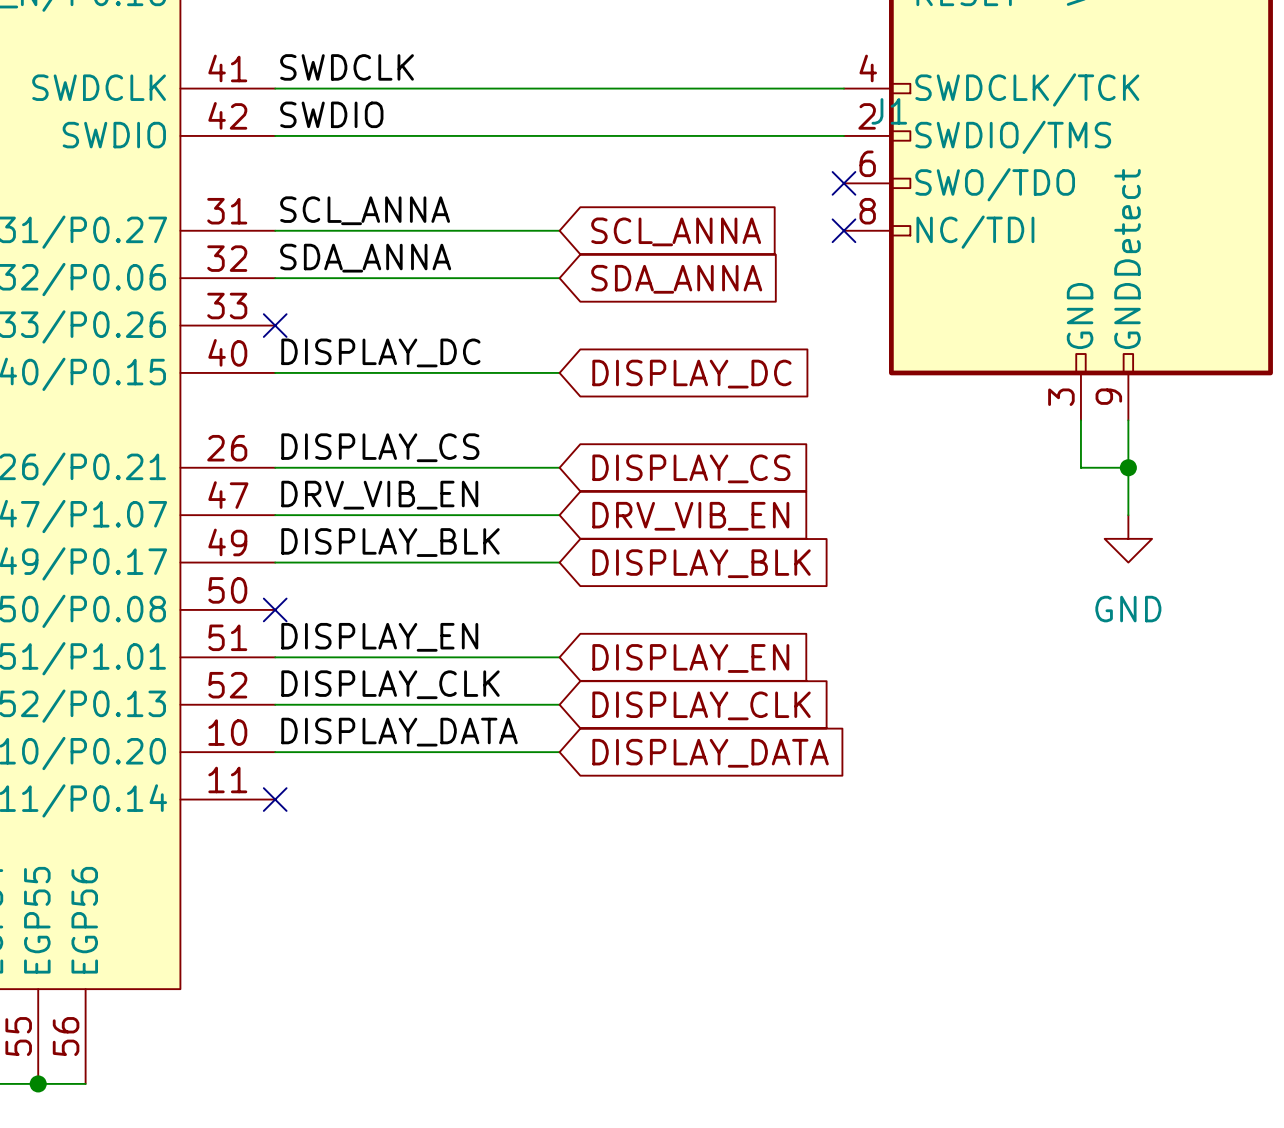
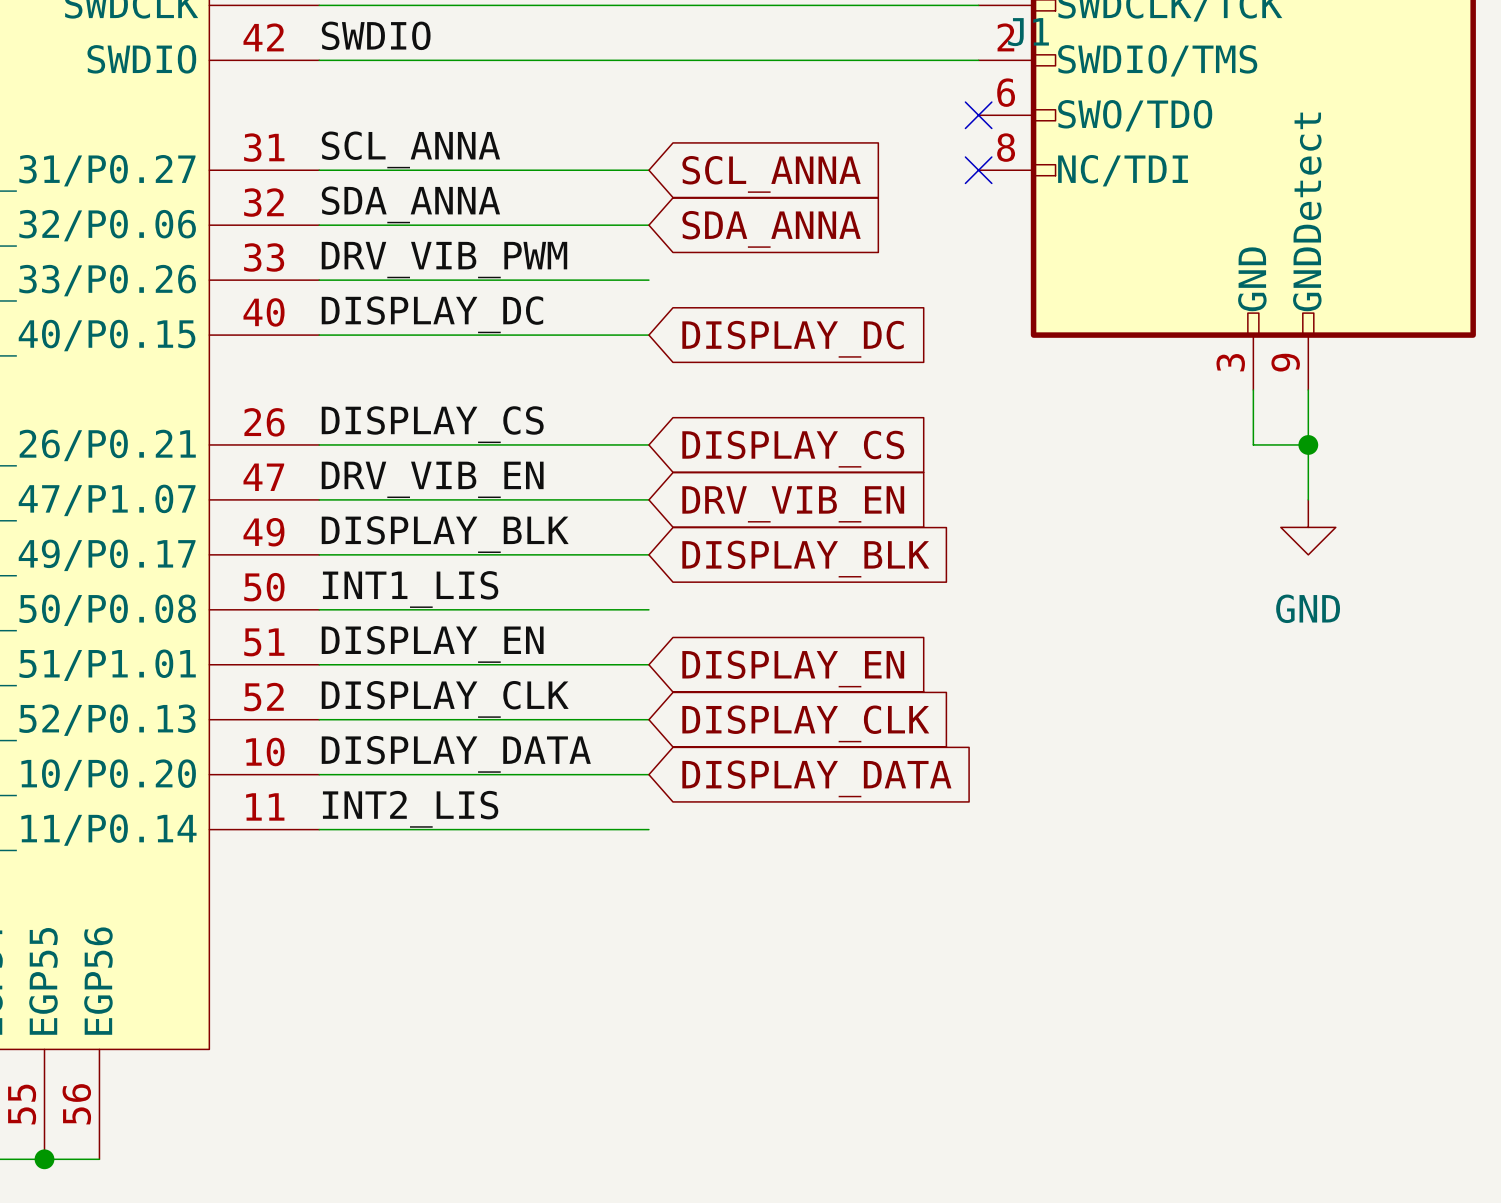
label: none -> DRV_VIB_PWM (444, 260)
wire: none -> (319, 280) (648, 280)
no-connect mark: (275, 325) -> none
label: none -> INT1_LIS (410, 589)
wire: none -> (319, 609) (648, 609)
no-connect mark: (275, 609) -> none
label: none -> INT2_LIS (410, 809)
wire: none -> (319, 829) (648, 829)
no-connect mark: (275, 799) -> none

